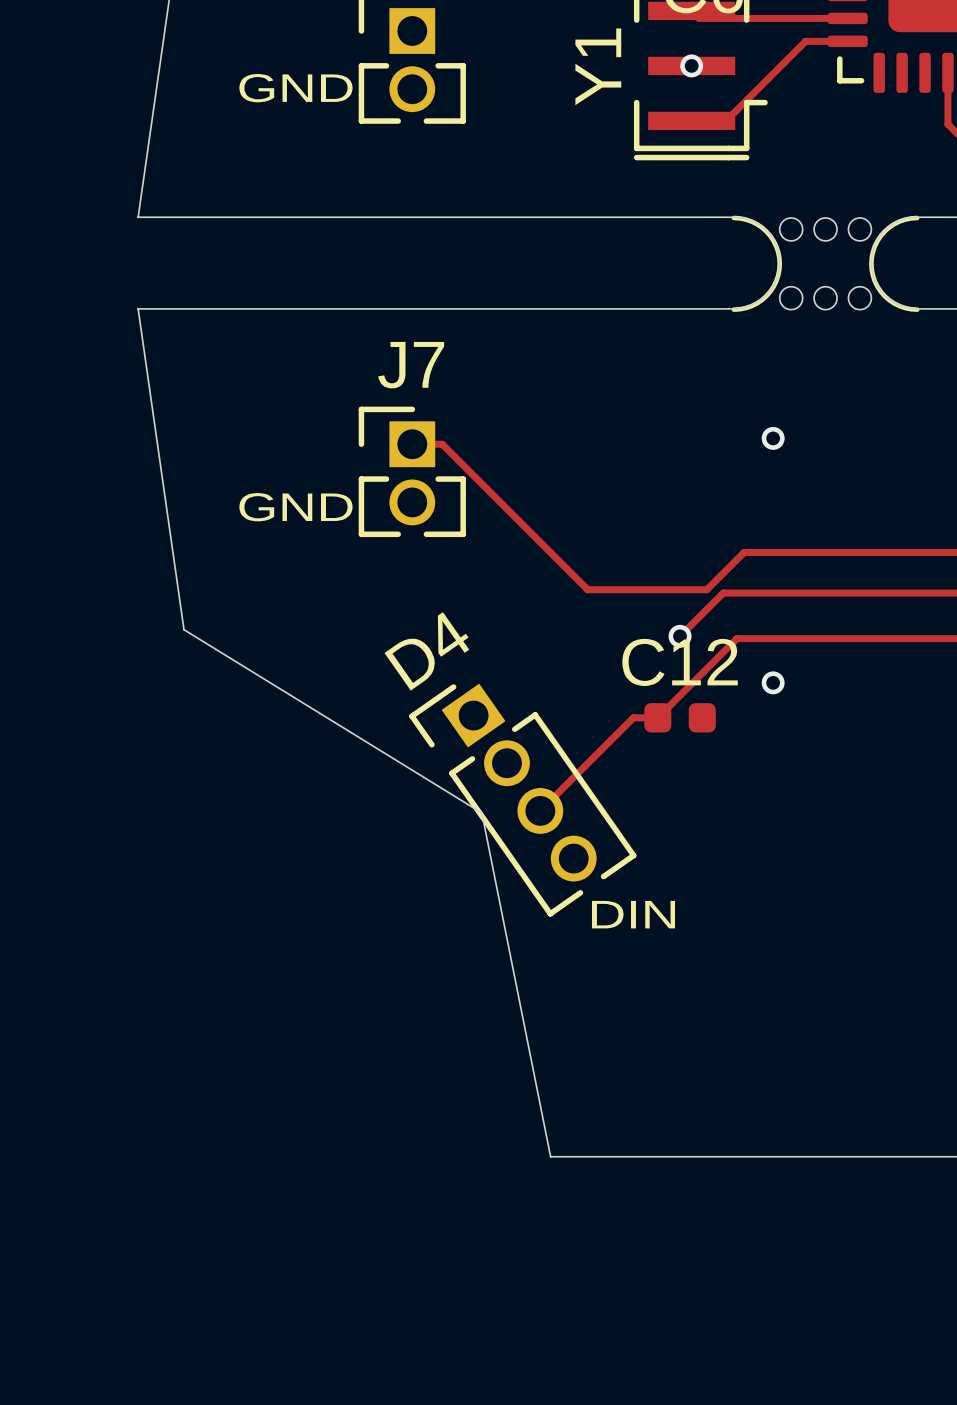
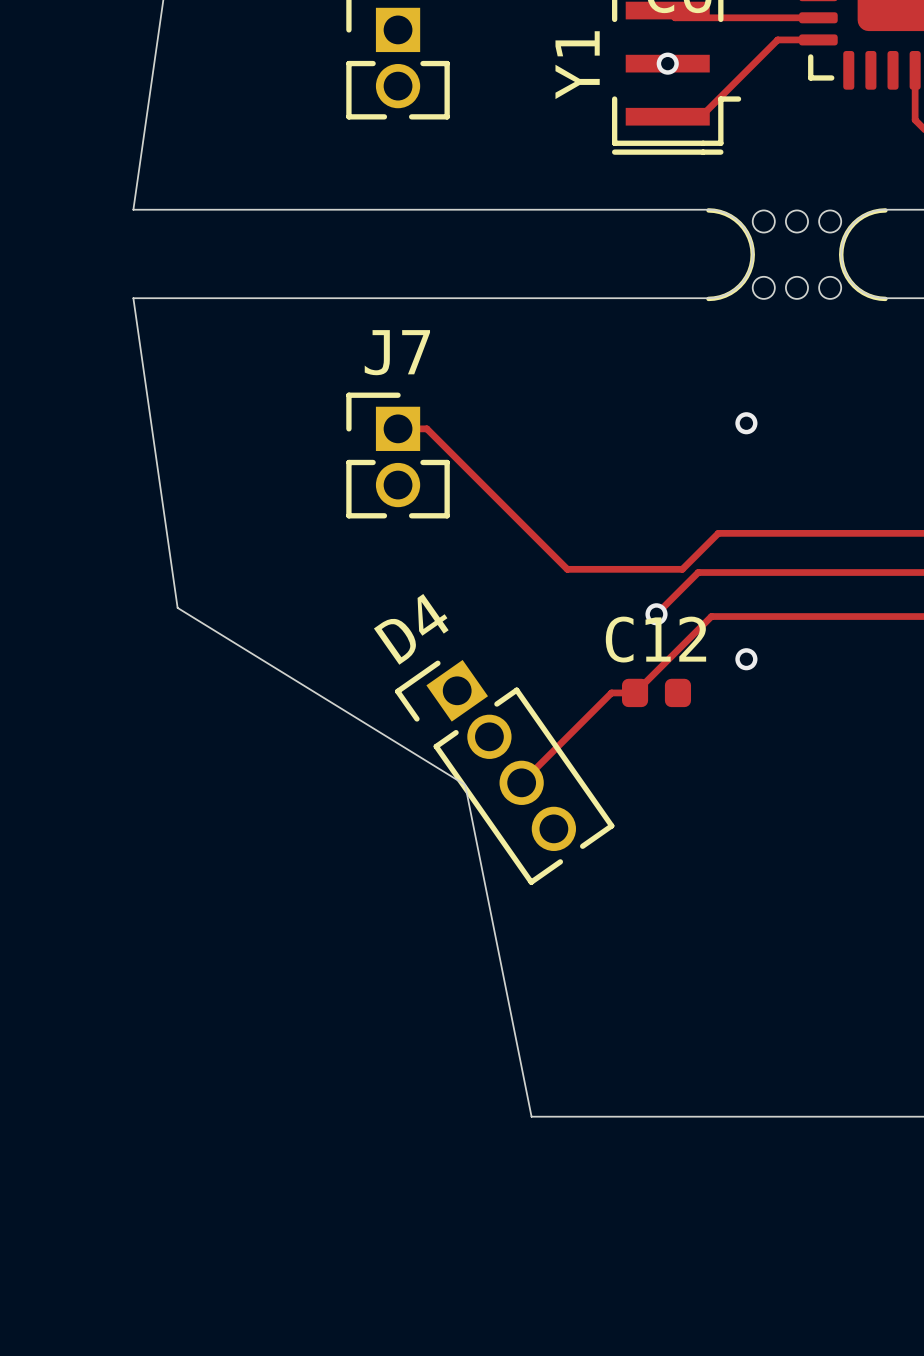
text: GND (295, 88) -> none
text: GND (295, 507) -> none
text: DIN (633, 914) -> none

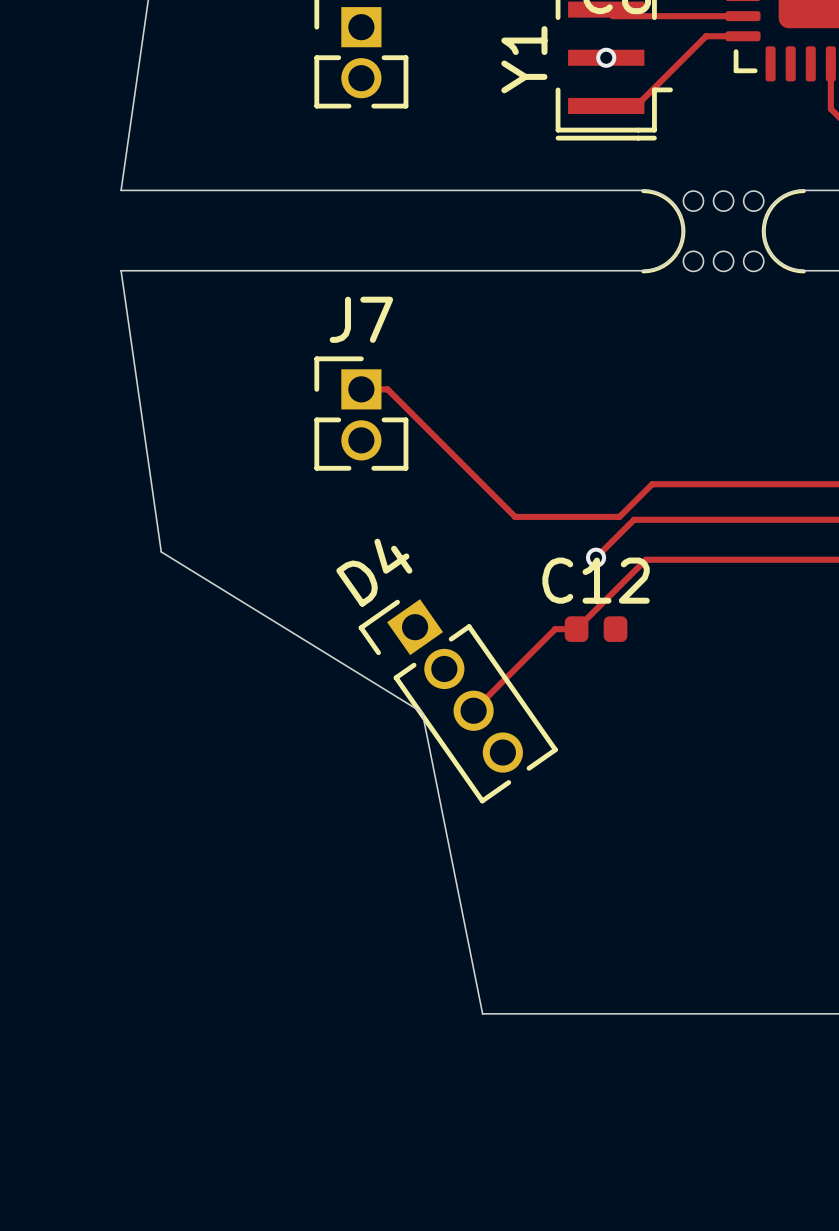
via: (746, 423) -> none
via: (746, 659) -> none

